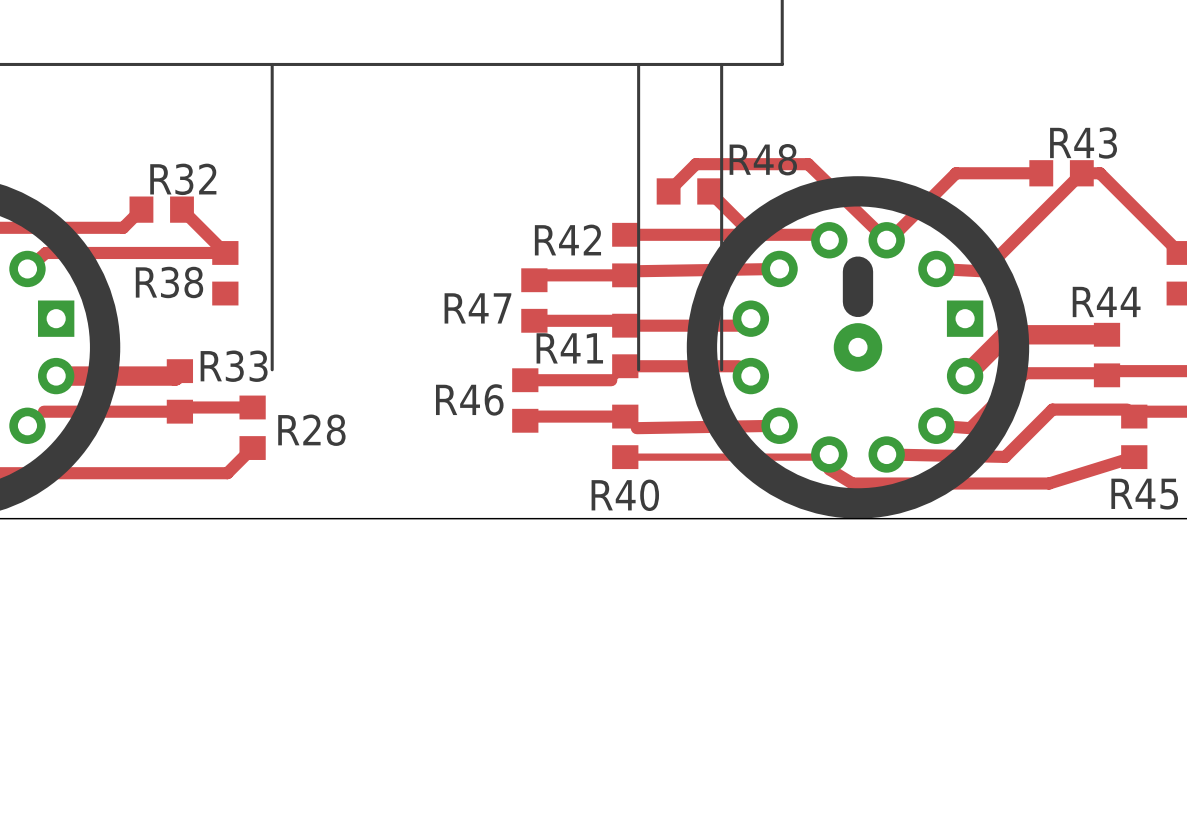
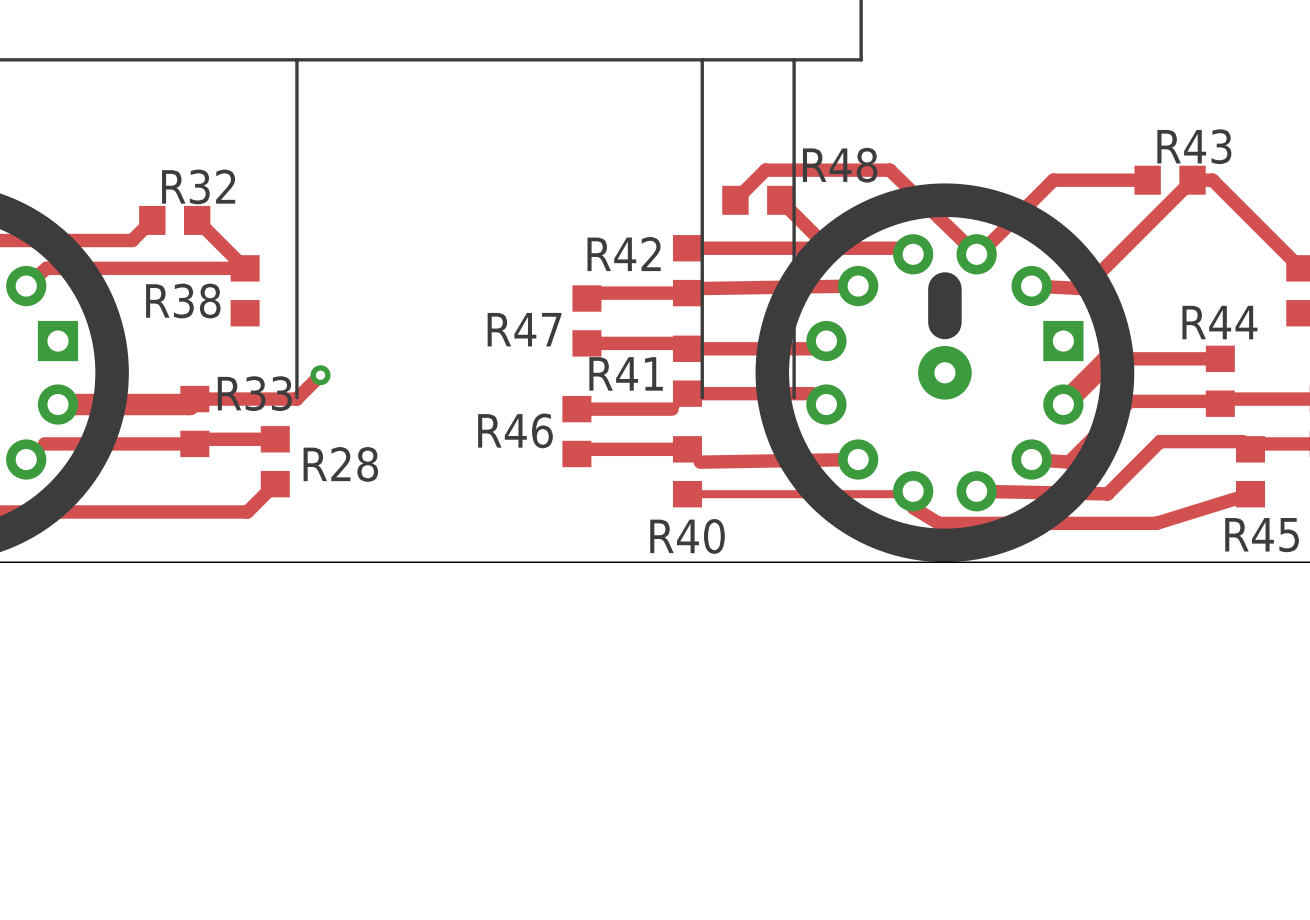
track width: thick (1008, 334) (1107, 334) -> thin (1111, 358) (1220, 358)
track: none -> (320, 375) (296, 399) (194, 399)
via: none -> (320, 375)

